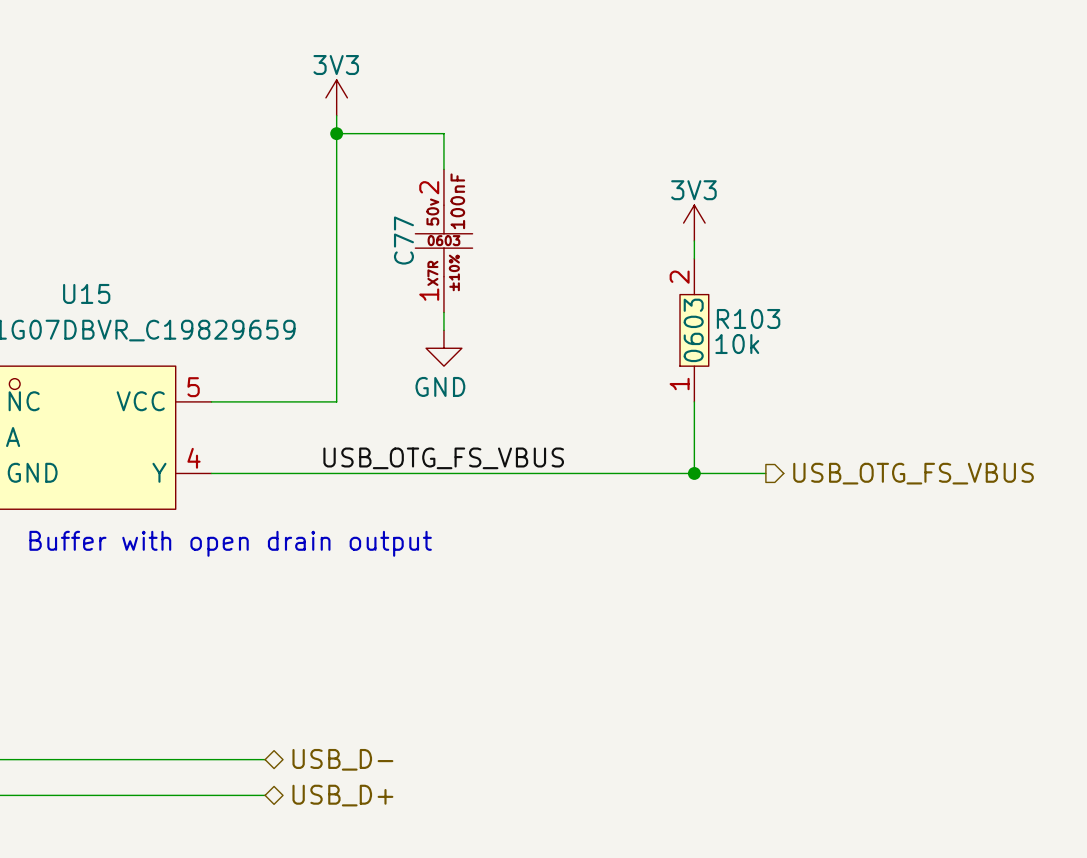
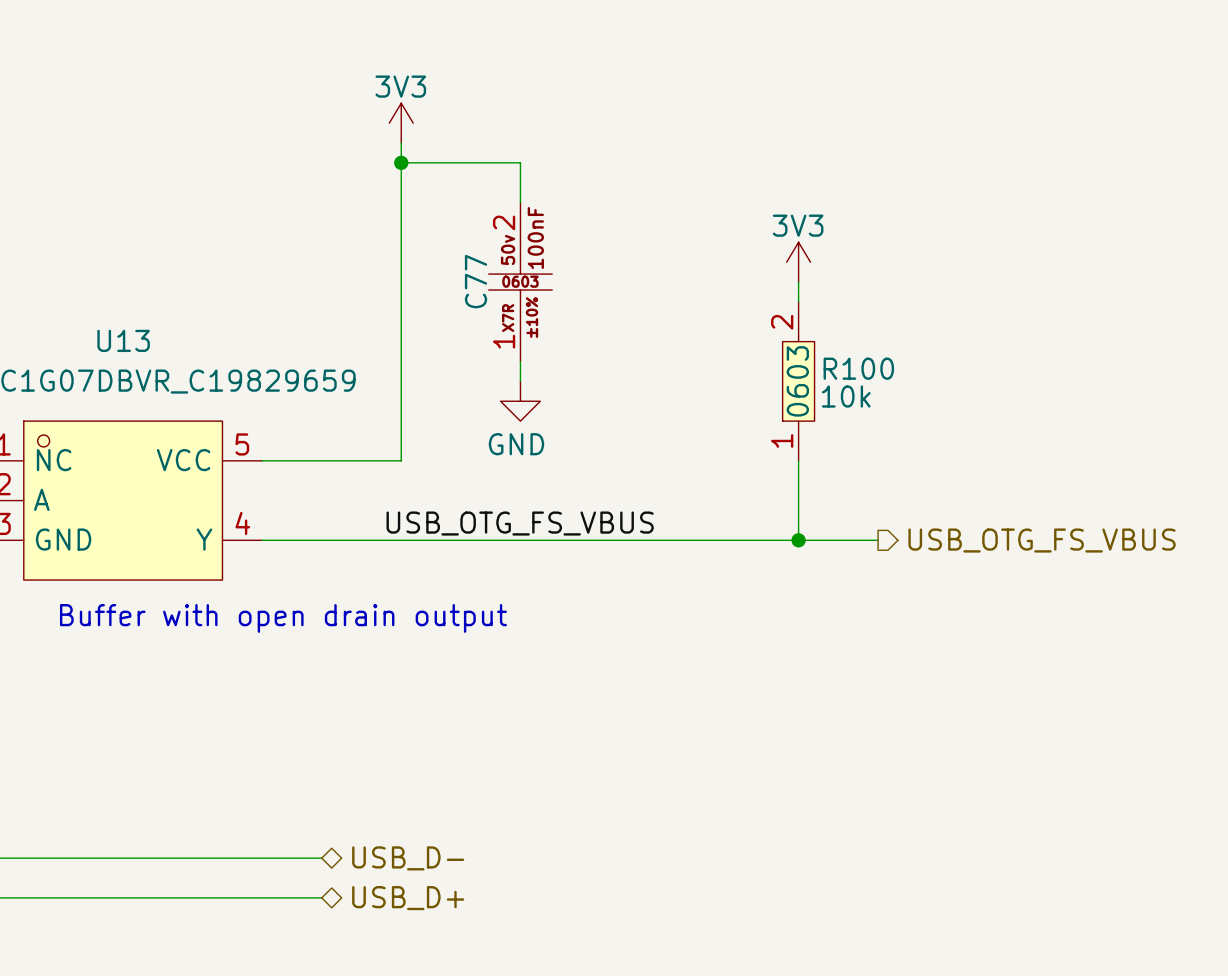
U15 name: U15 (86, 293) -> U13 (123, 340)
R103 name: R103 (748, 318) -> R100 (858, 368)

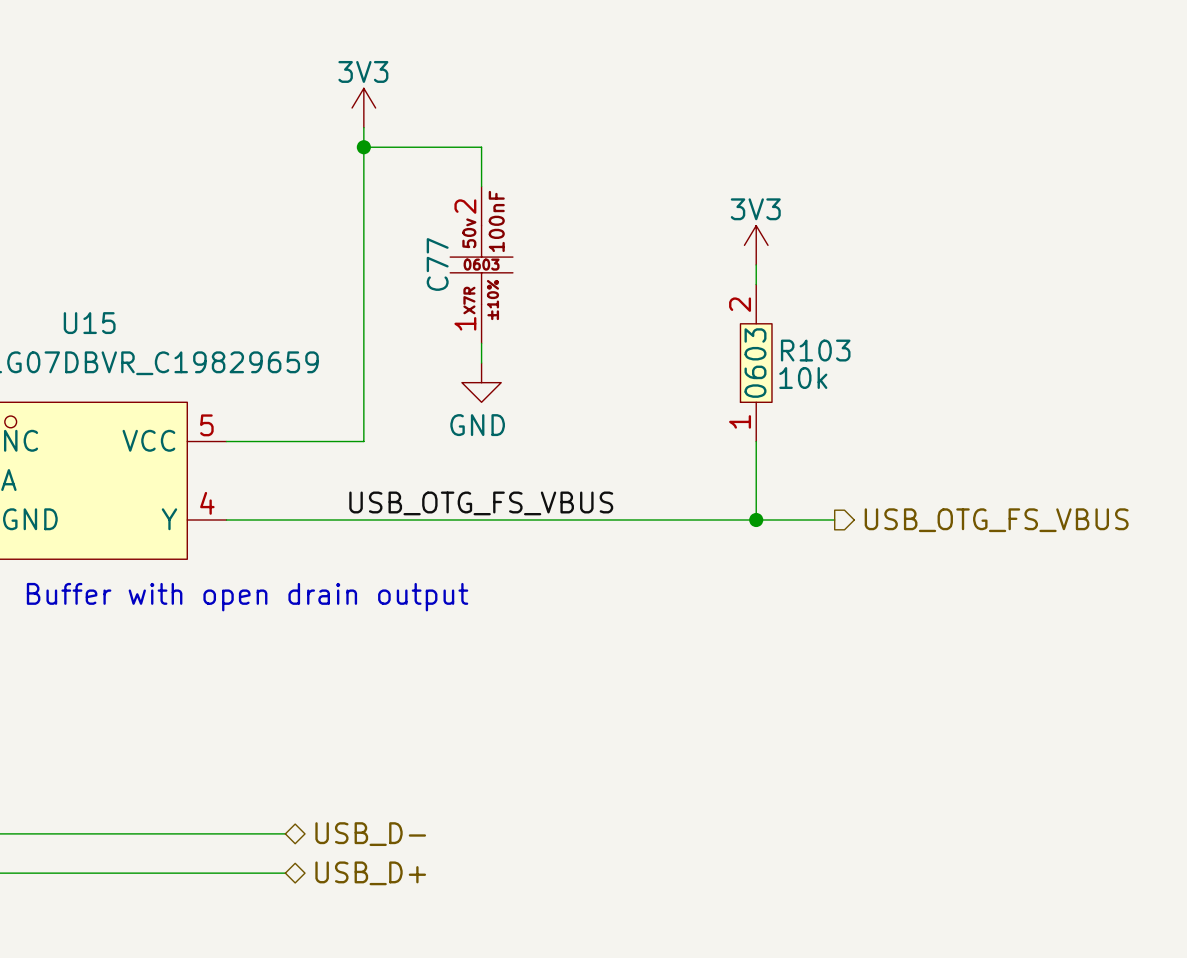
U13 name: U13 (123, 340) -> U15 (89, 323)
R100 name: R100 (858, 368) -> R103 (815, 350)

